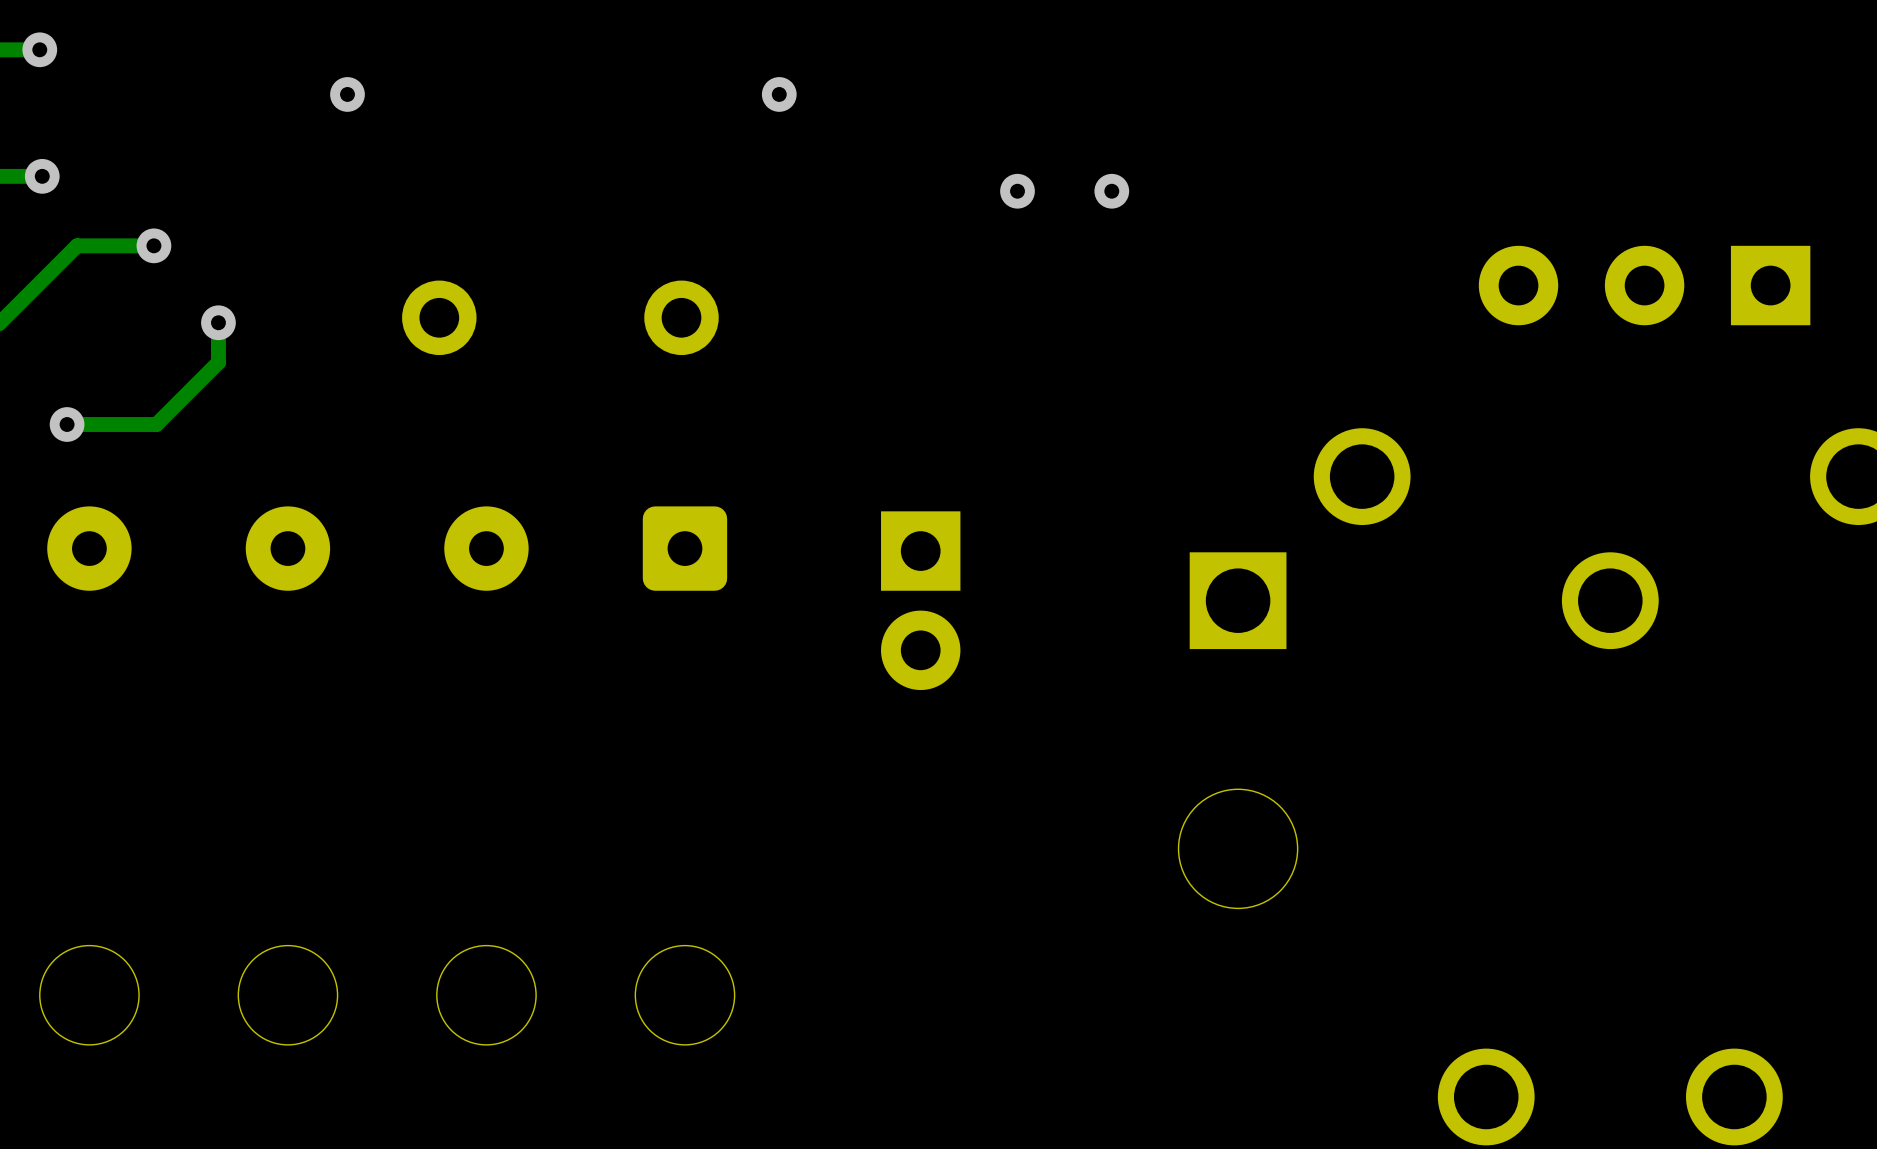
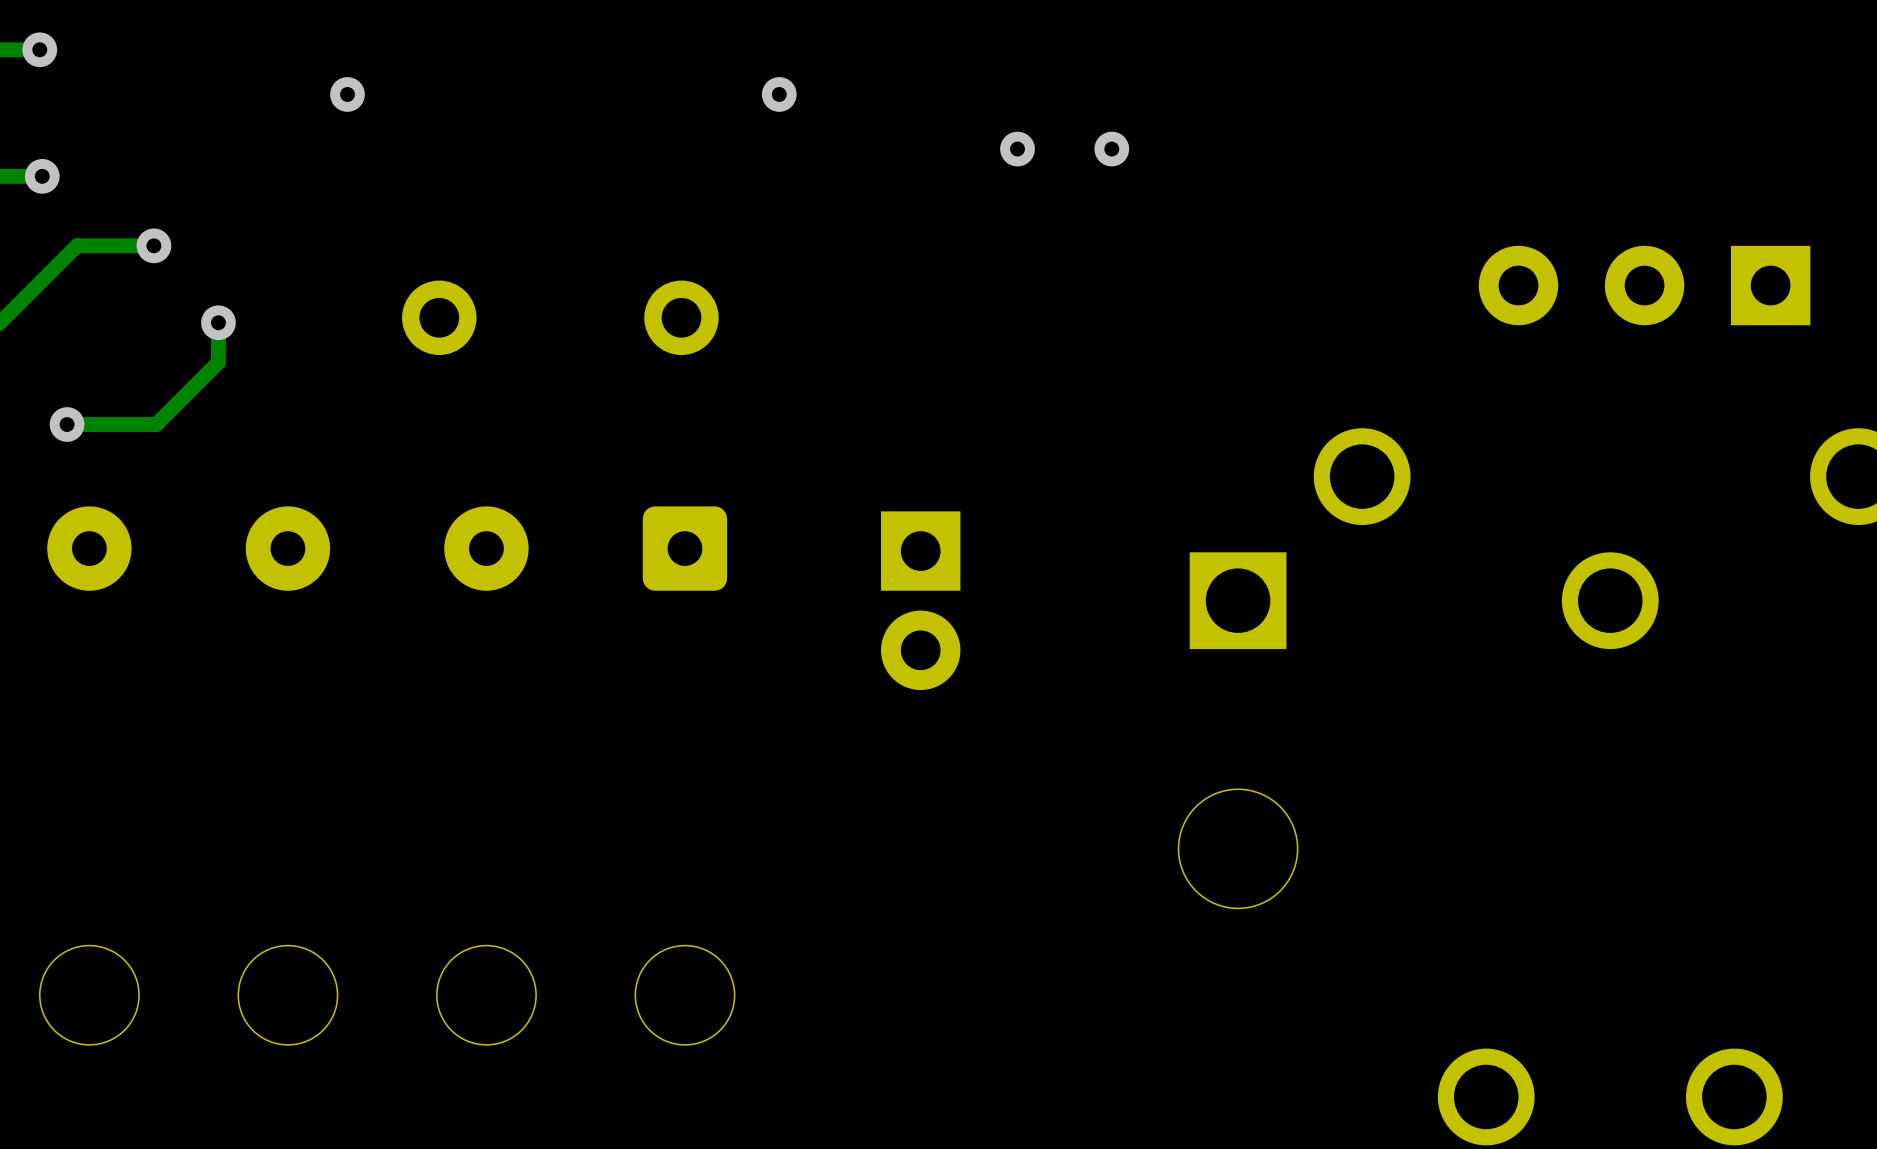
via position: (1017, 191) -> (1017, 149)
via position: (1111, 191) -> (1111, 149)

